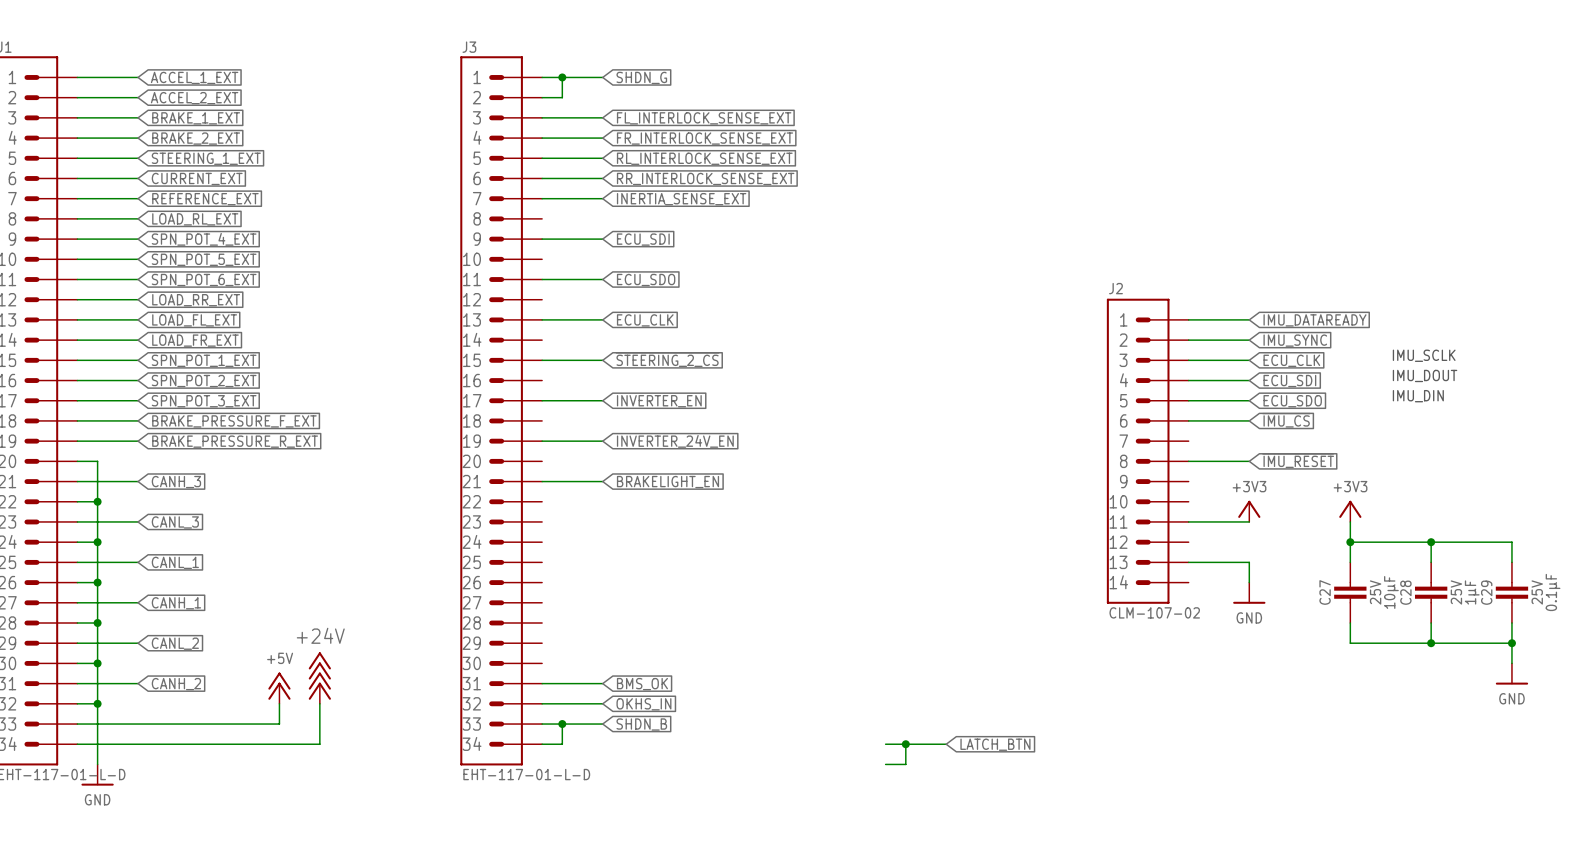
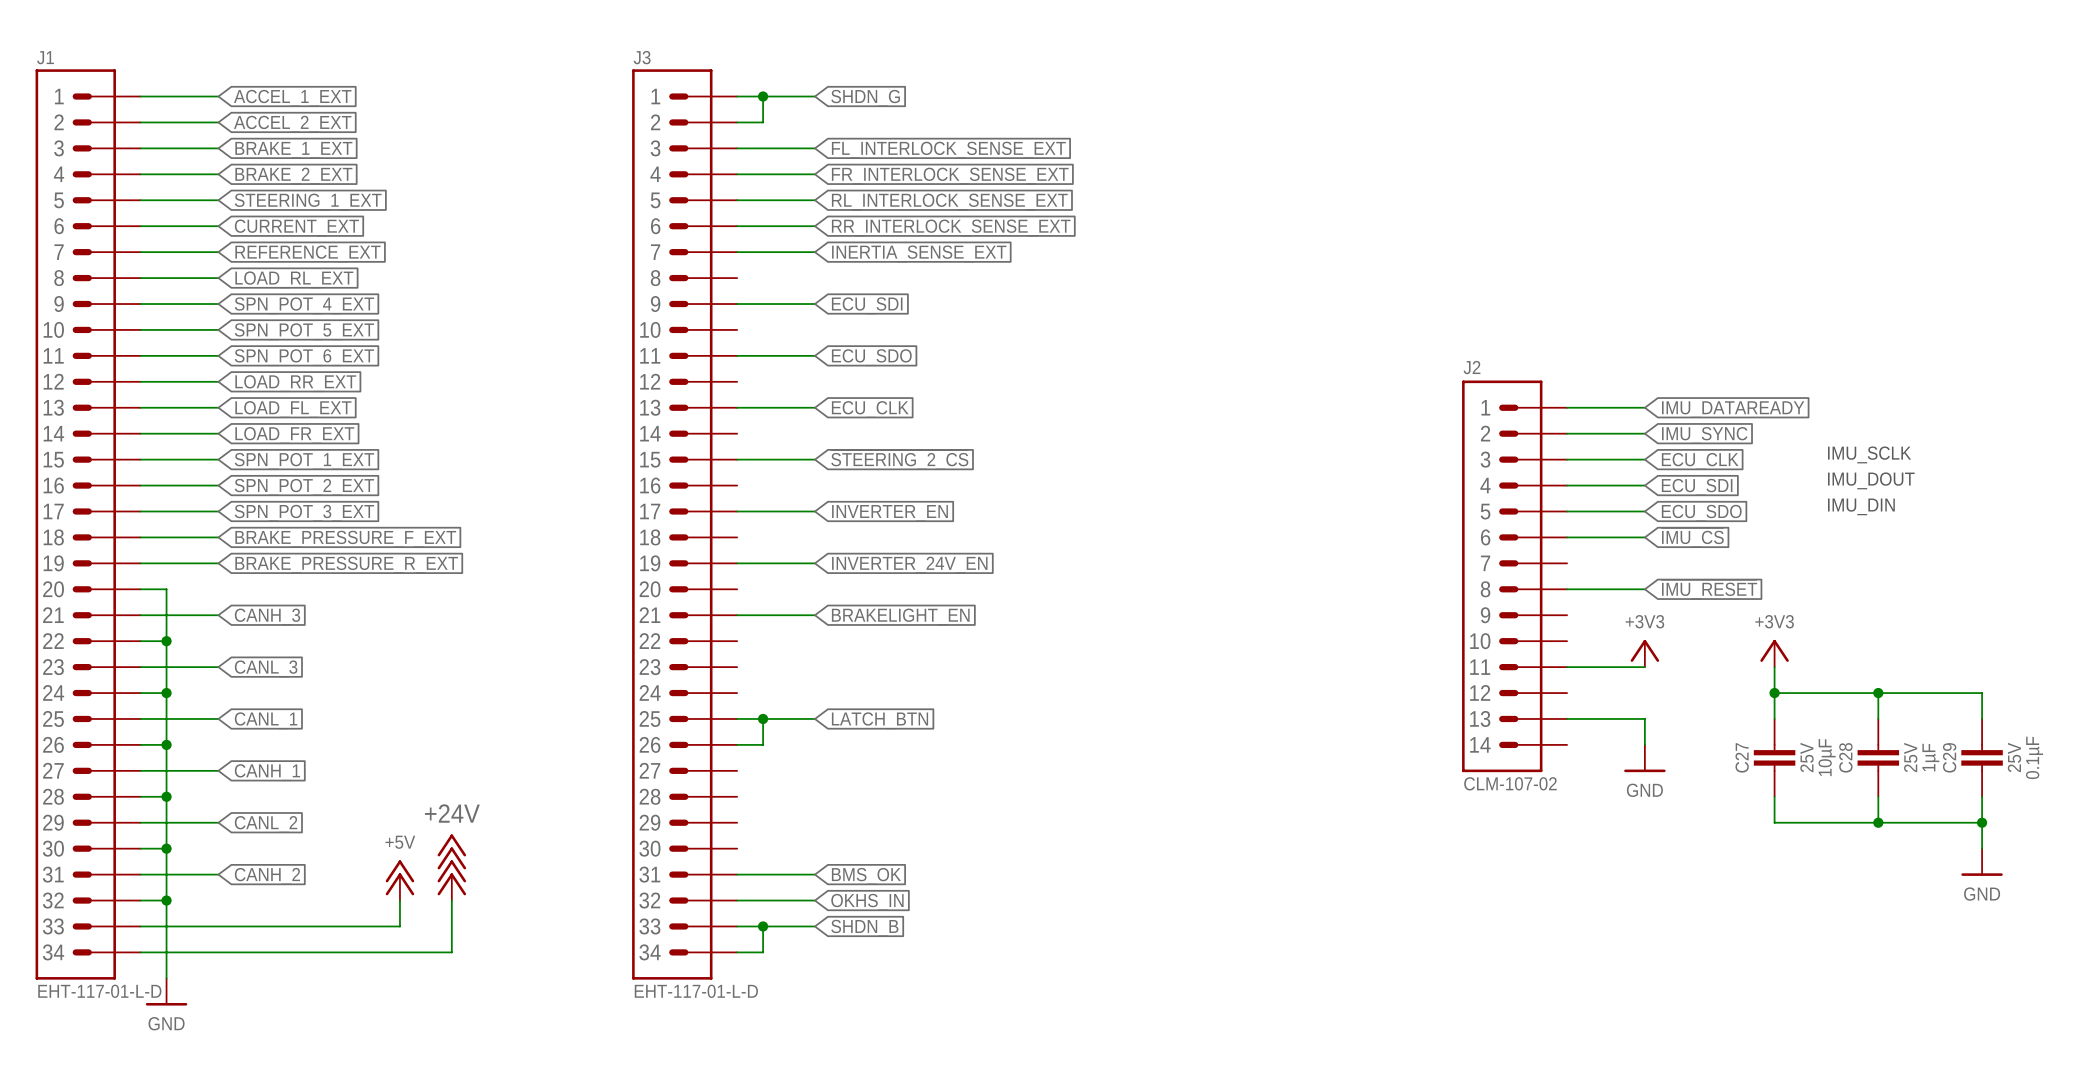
wire: none -> (737, 718) (814, 718)
wire: none -> (763, 718) (763, 744) (737, 744)
junction: none -> (763, 718)
global label: none -> LATCH_BTN (880, 720)
wire: (885, 744) (946, 744) -> none
wire: (905, 744) (905, 764) (885, 764) -> none
junction: (905, 744) -> none
global label: LATCH_BTN (995, 744) -> none

